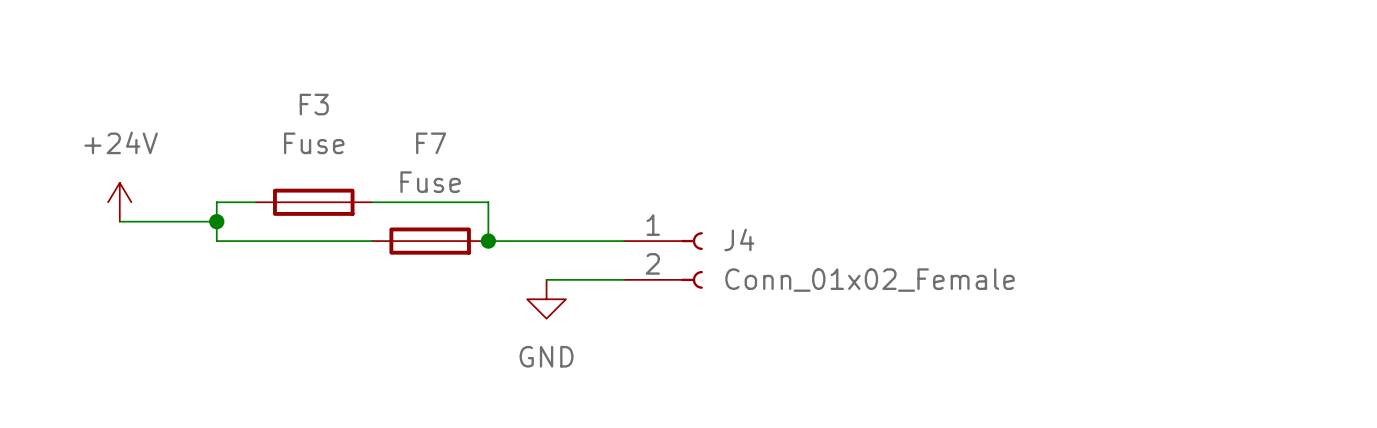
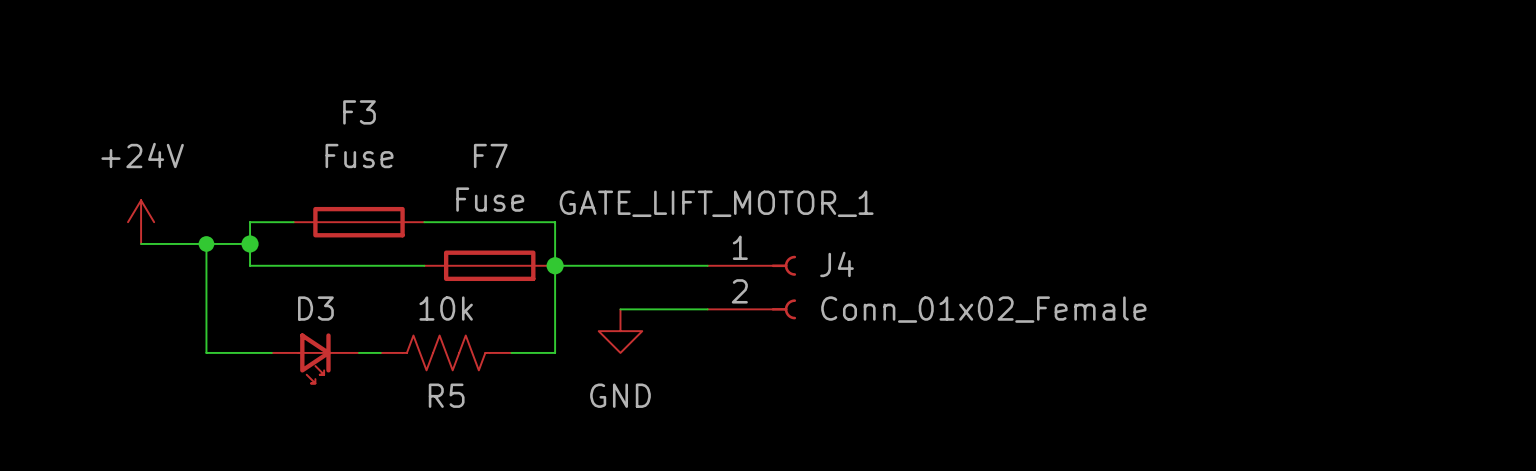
label: none -> GATE_LIFT_MOTOR_1 (716, 203)
wire: none -> (206, 243) (206, 352) (271, 352)
junction: none -> (206, 243)
wire: none -> (555, 265) (555, 352) (511, 352)
wire: none -> (358, 352) (380, 352)
R5: none -> 10k (446, 352)
D3: none -> (315, 358)

